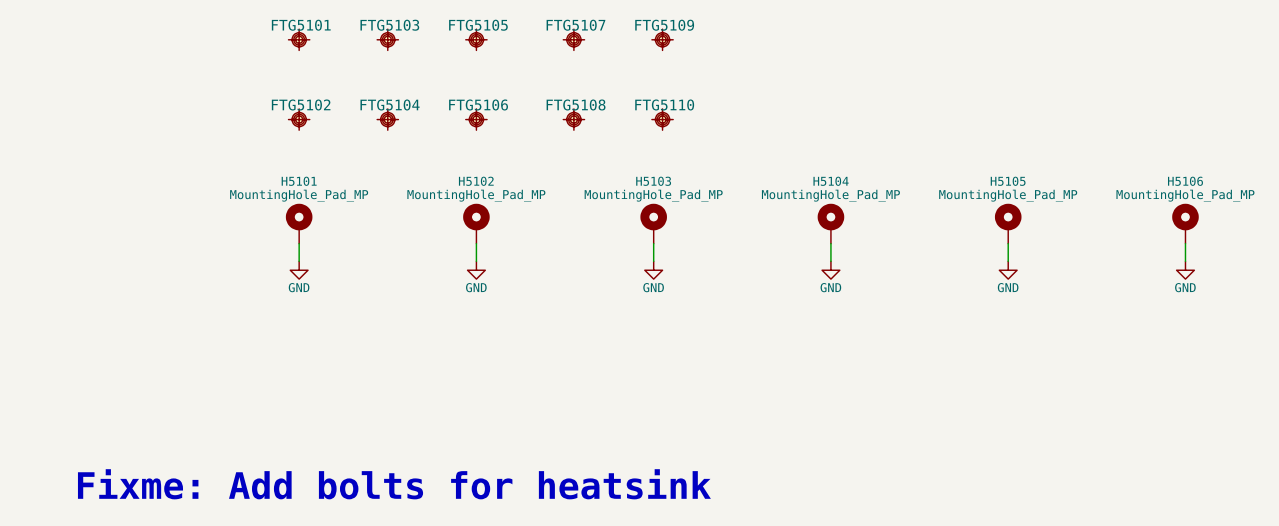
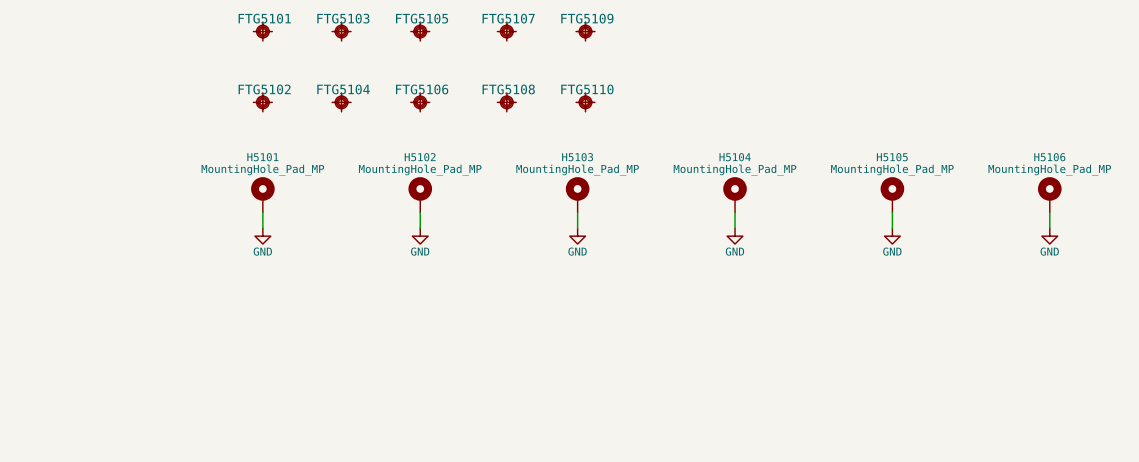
text: Fixme: Add bolts for heatsink (394, 484) -> none

